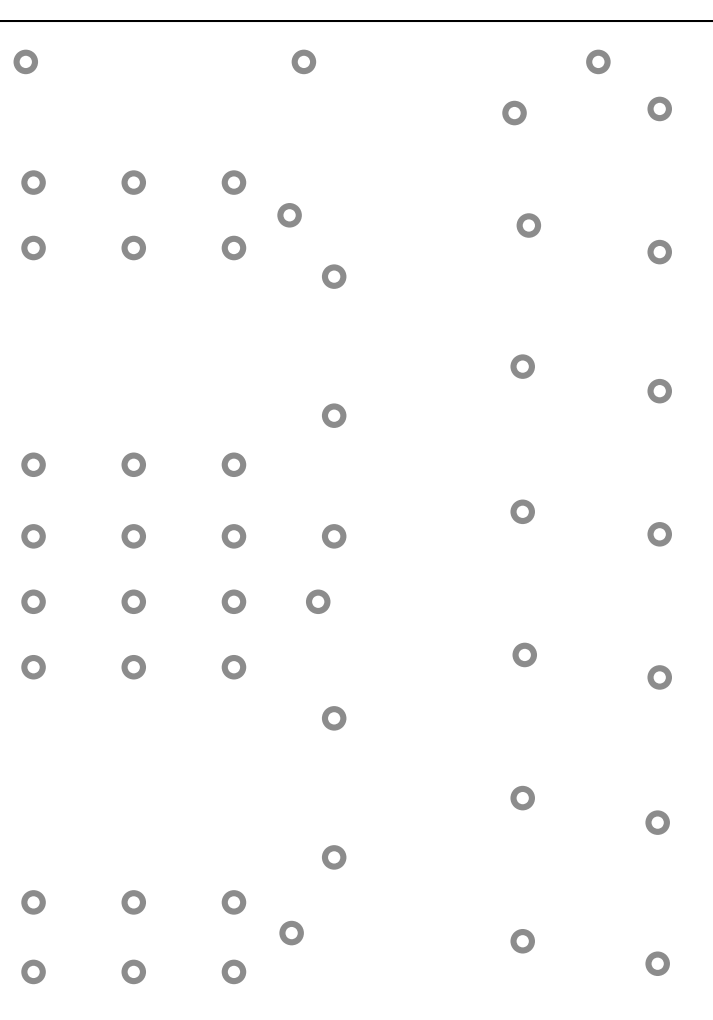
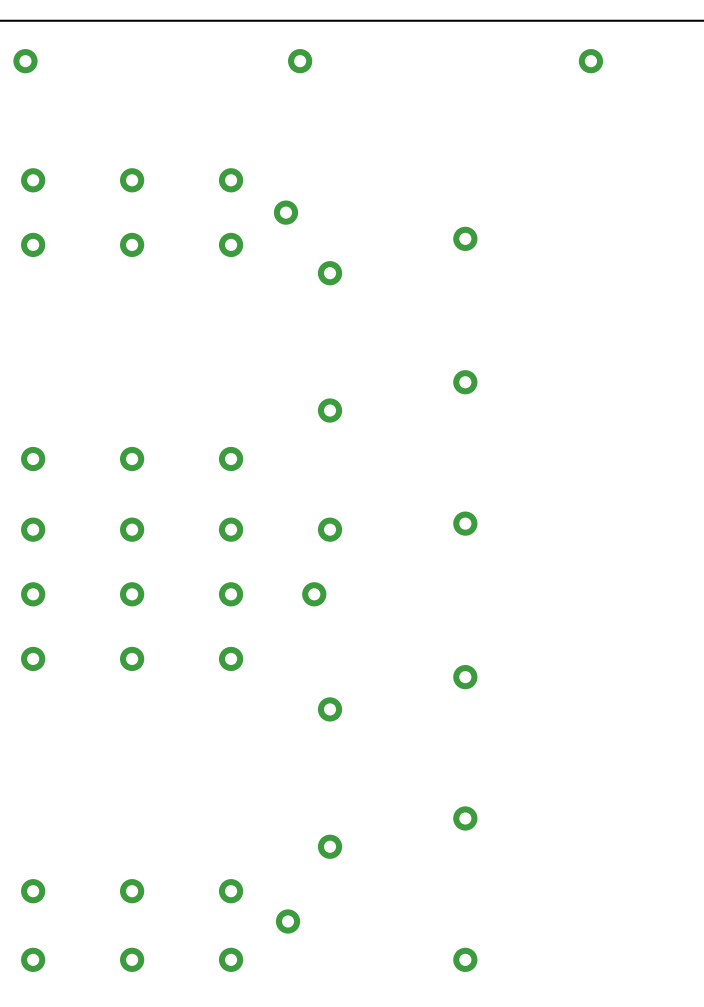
via: (659, 108) -> none
via: (514, 113) -> none
via position: (528, 225) -> (465, 238)
via: (659, 252) -> none
via position: (522, 366) -> (465, 382)
via: (659, 391) -> none
via position: (522, 511) -> (465, 523)
via: (659, 534) -> none
via: (524, 654) -> none
via: (659, 677) -> none
via: none -> (465, 677)
via position: (522, 798) -> (465, 818)
via: (657, 822) -> none
via position: (522, 941) -> (465, 959)
via: (657, 963) -> none

